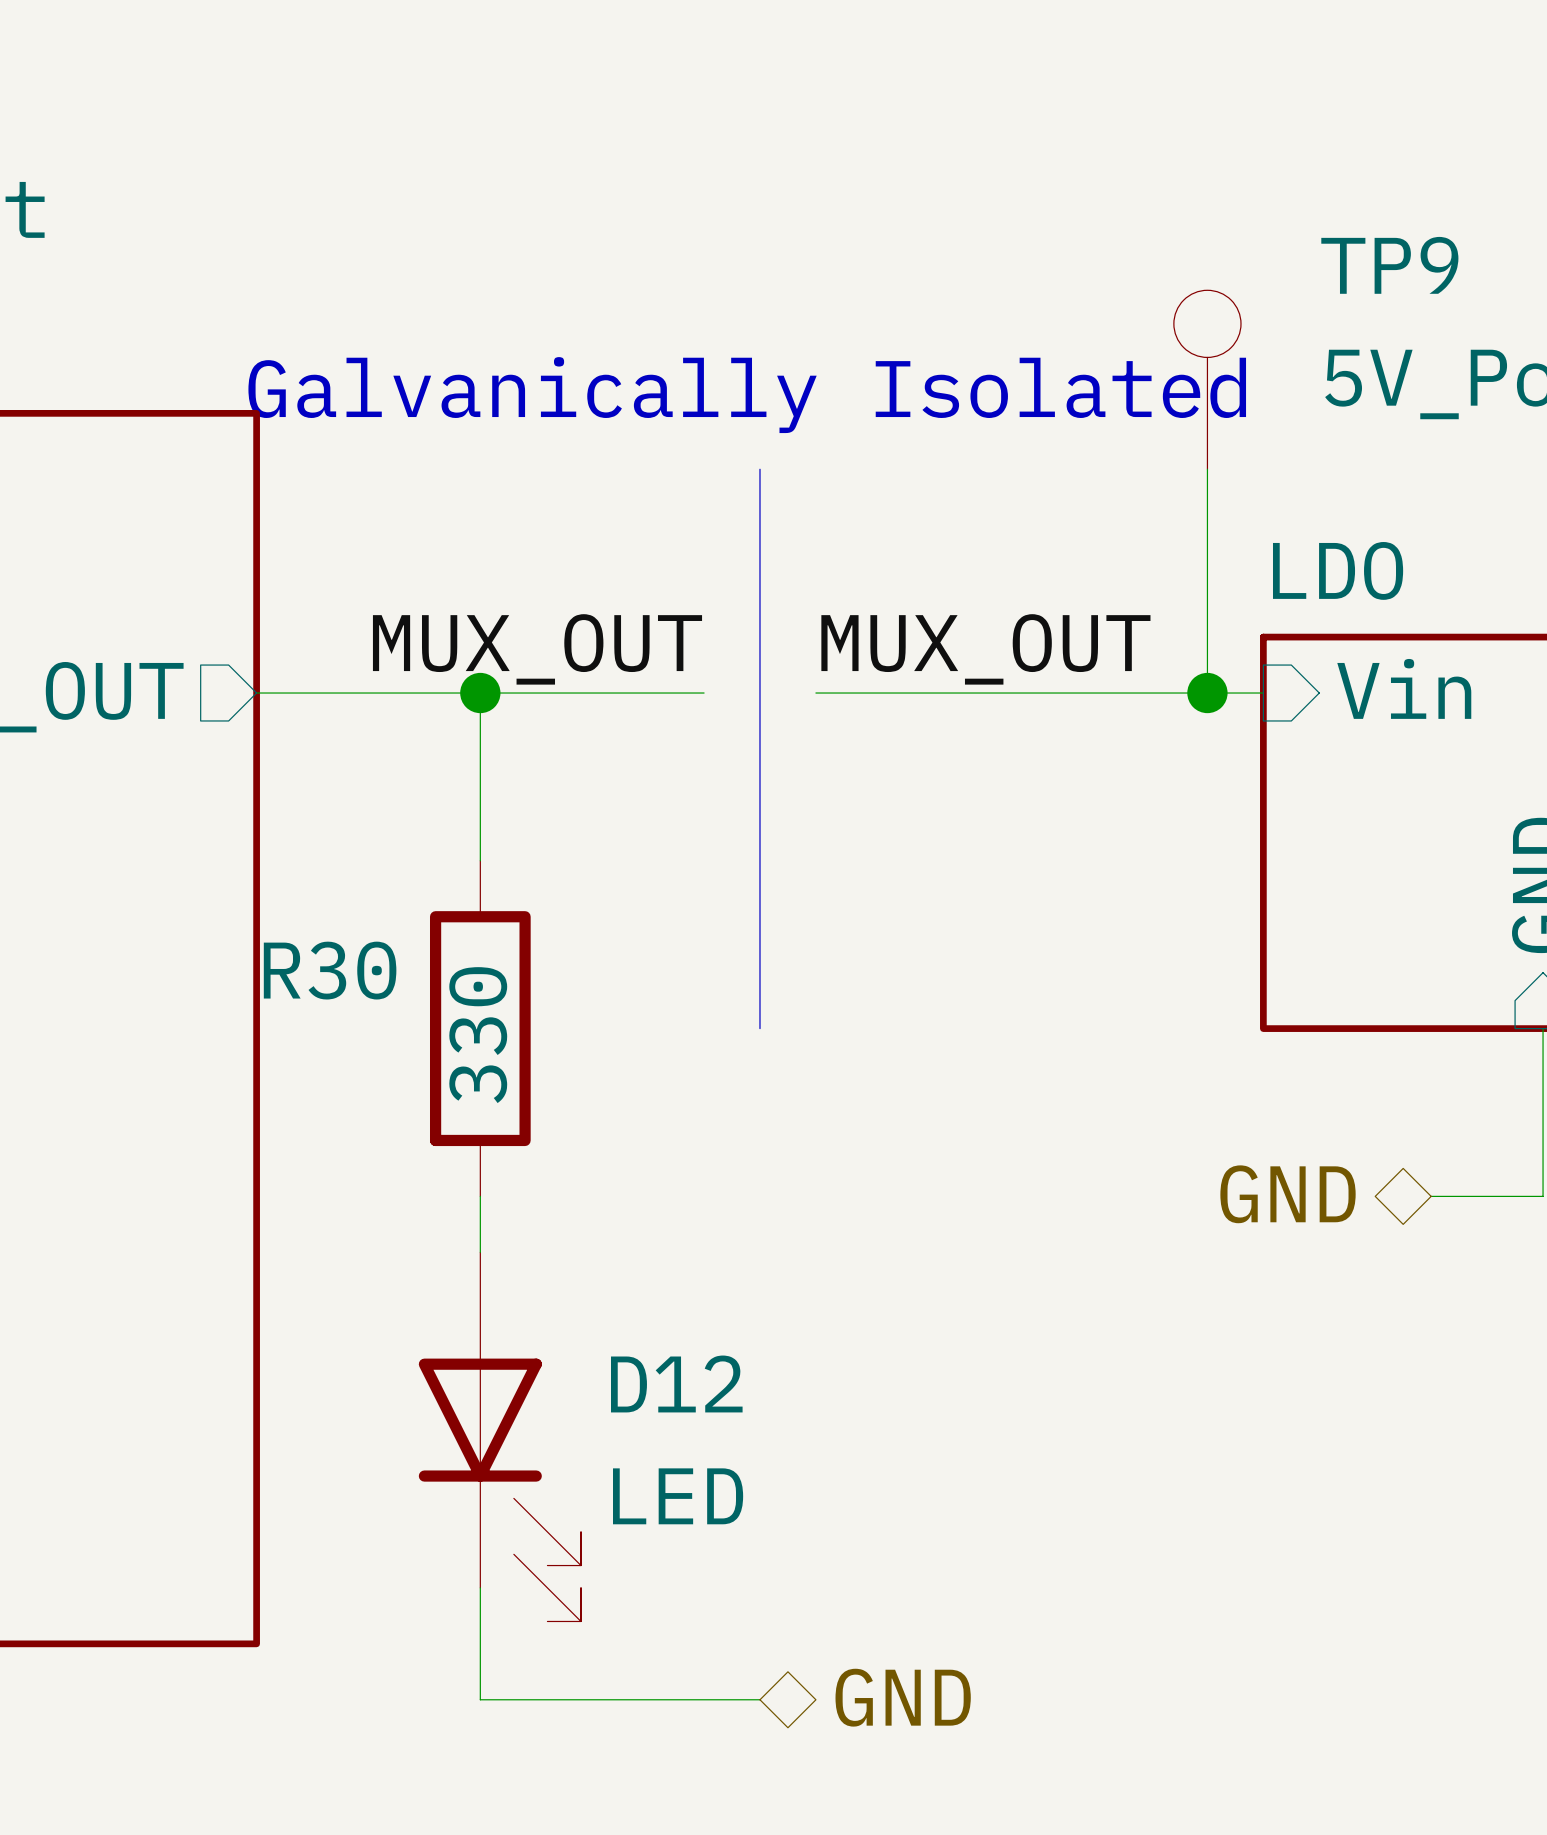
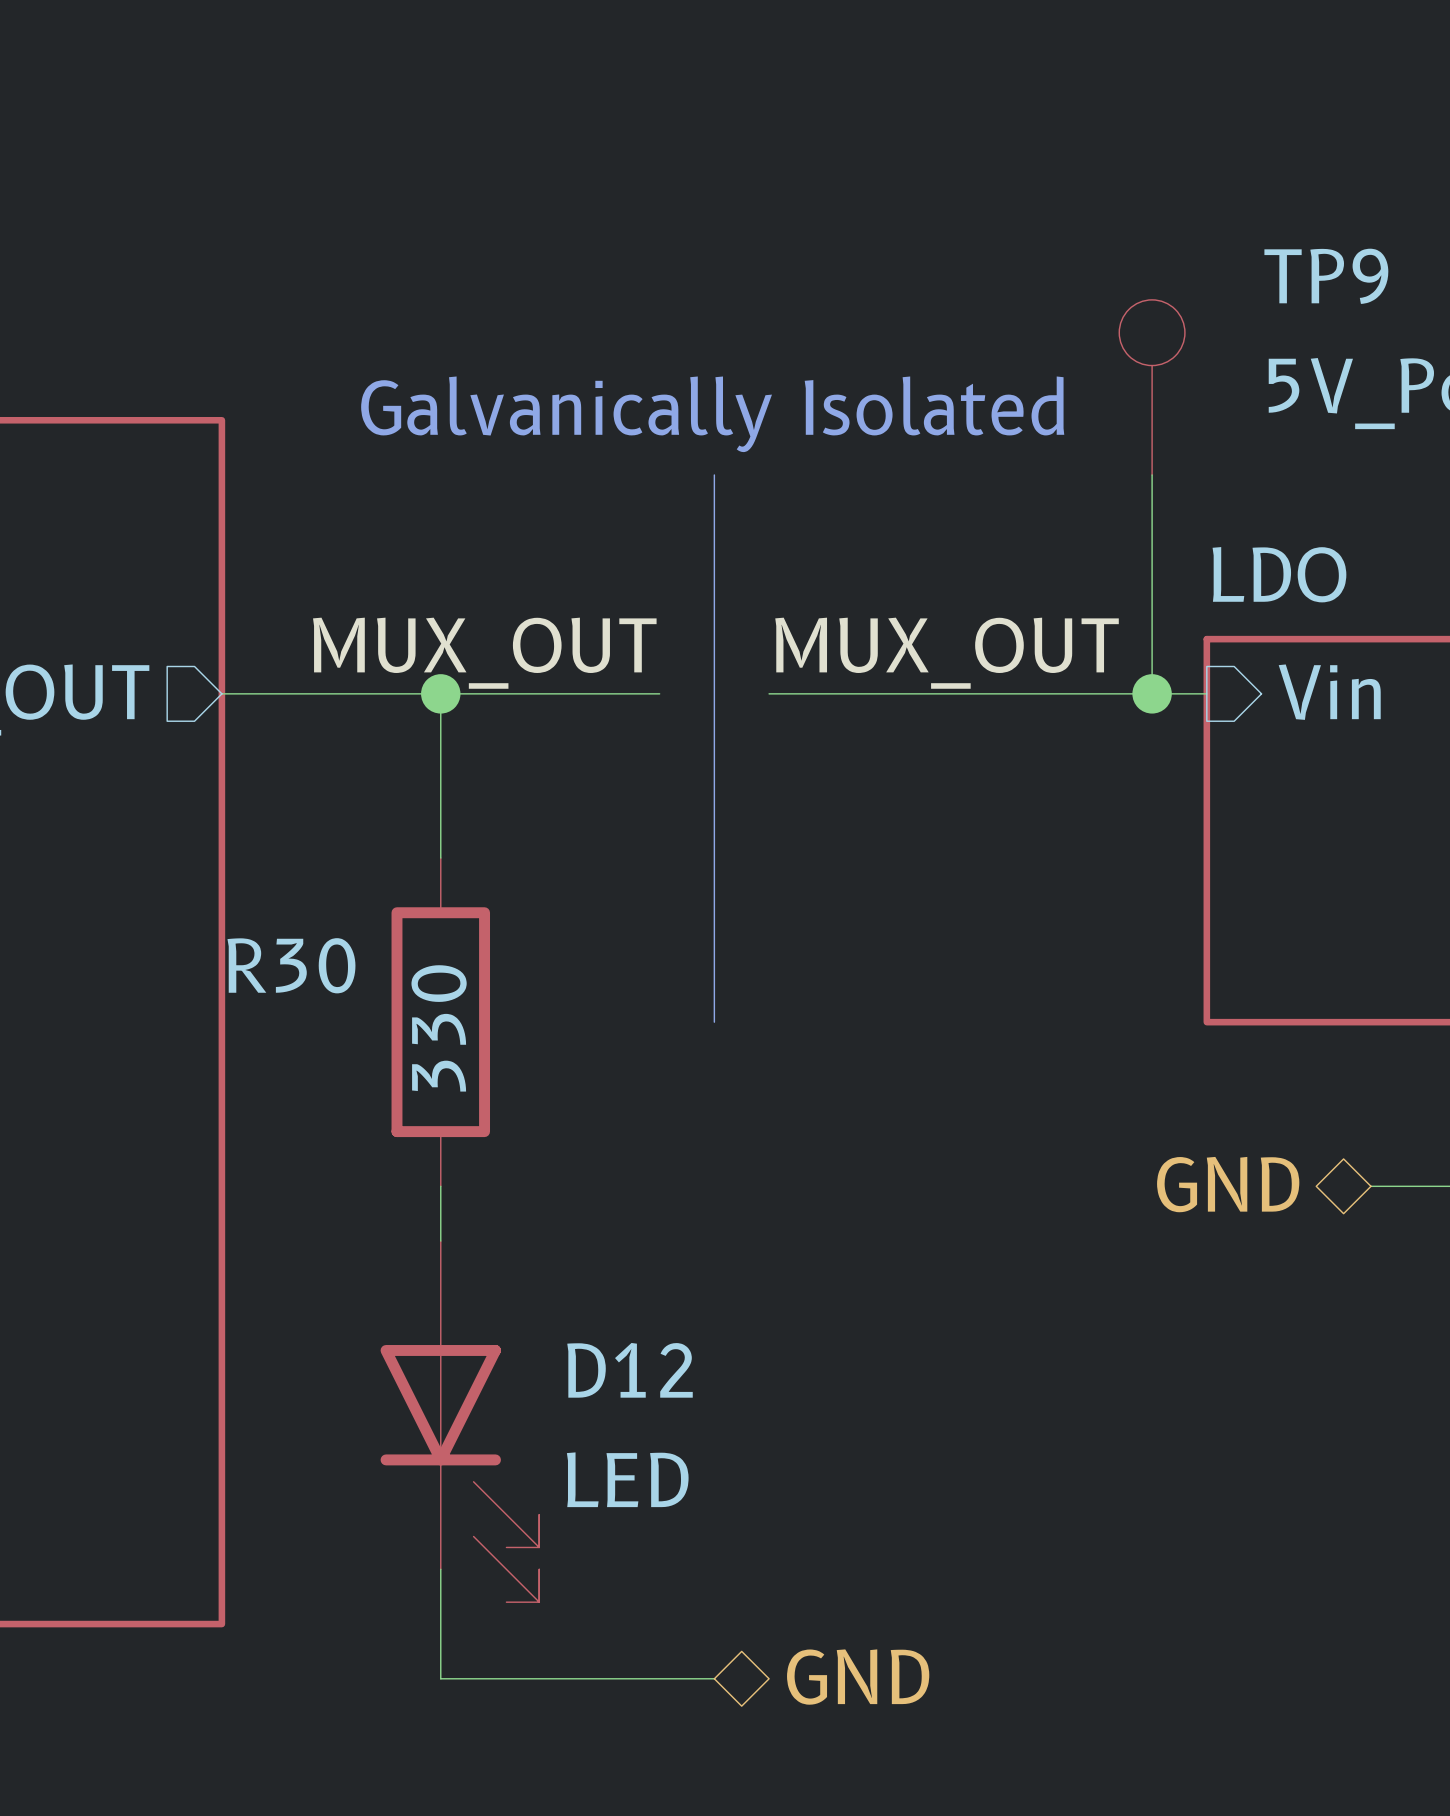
text position: Galvanically Isolated (747, 395) -> Galvanically Isolated (712, 414)

